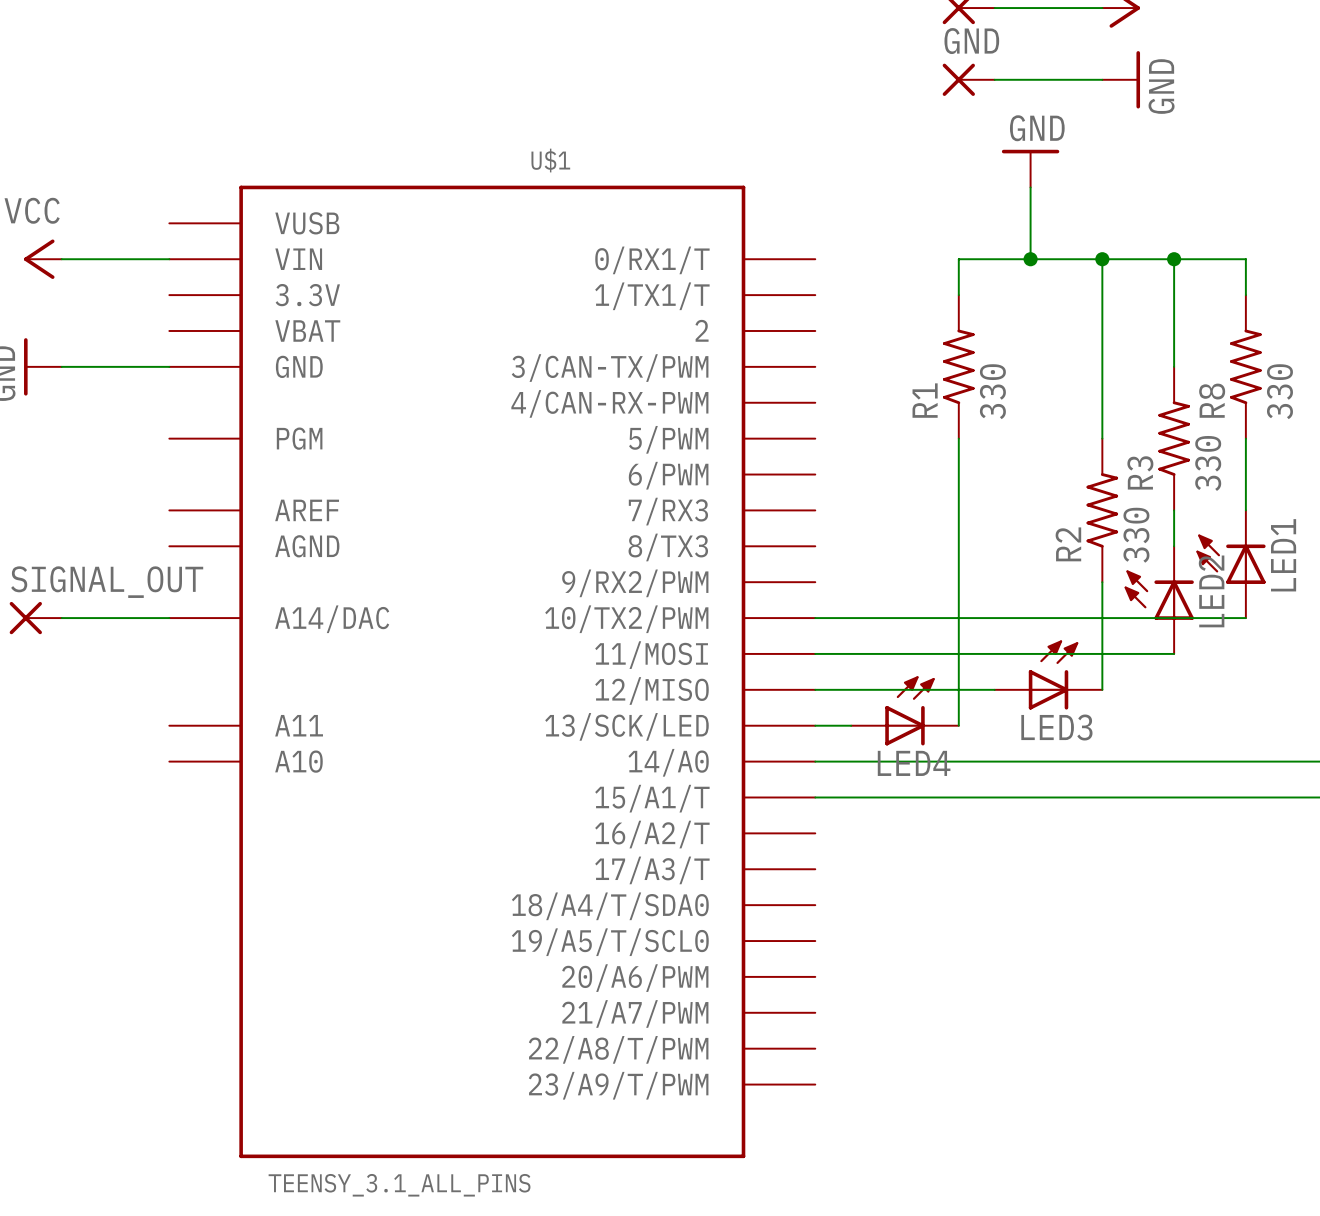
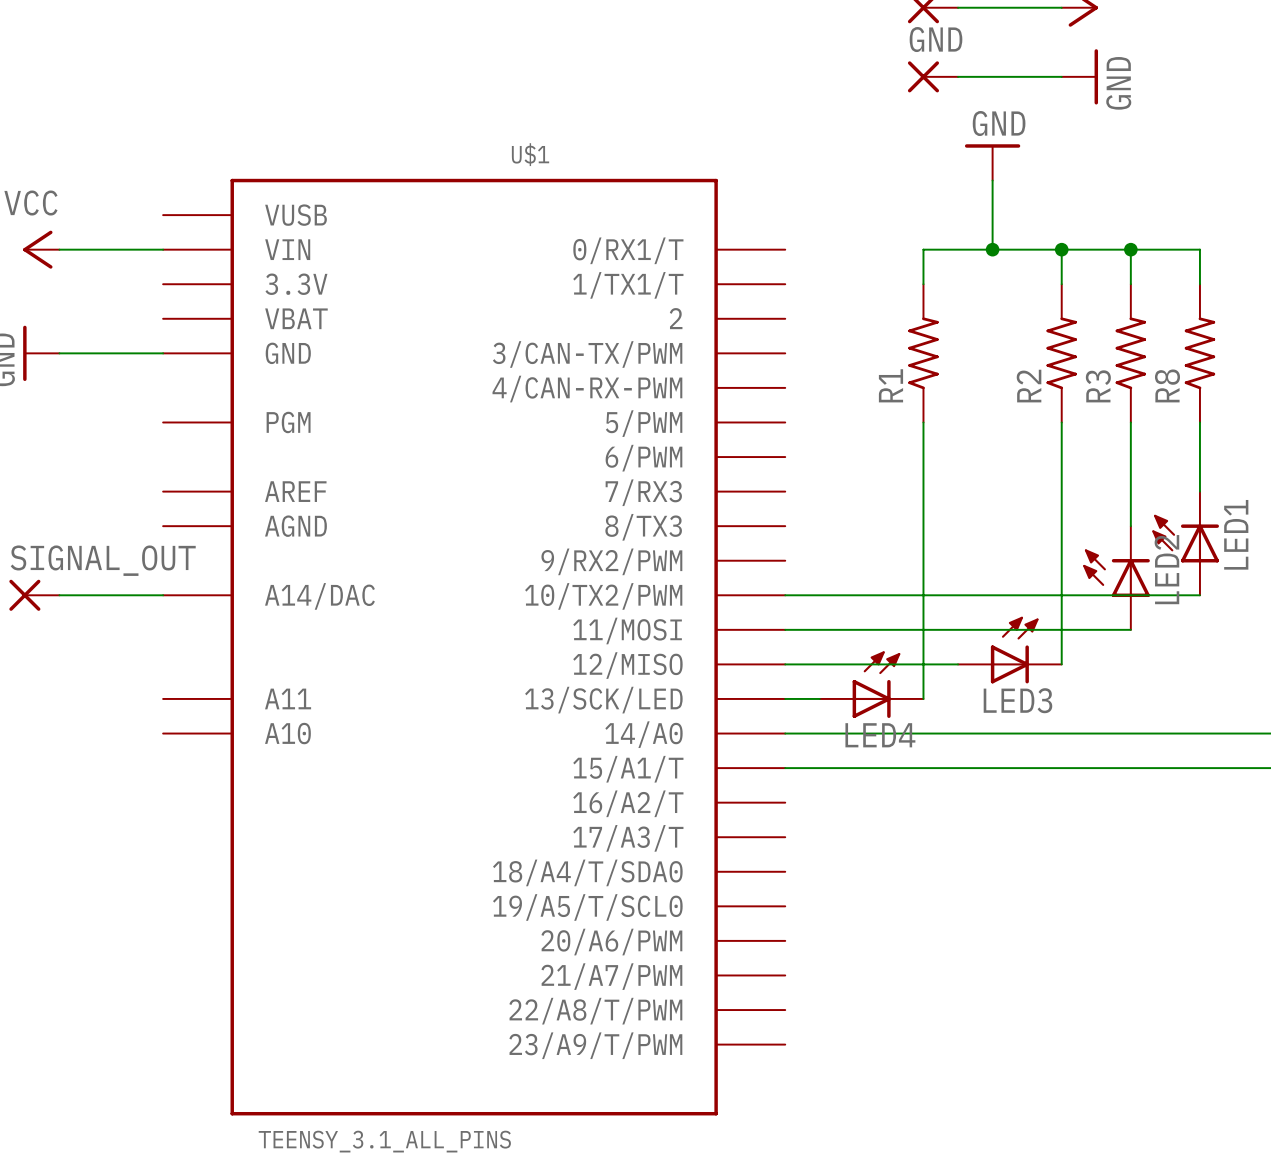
R1 value: 330 (992, 391) -> none
R8 value: 330 (1279, 391) -> none
R3 position: (1174, 438) -> (1130, 353)
R3 value: 330 (1208, 463) -> none
R2 position: (1102, 510) -> (1061, 353)
R2 value: 330 (1136, 535) -> none

